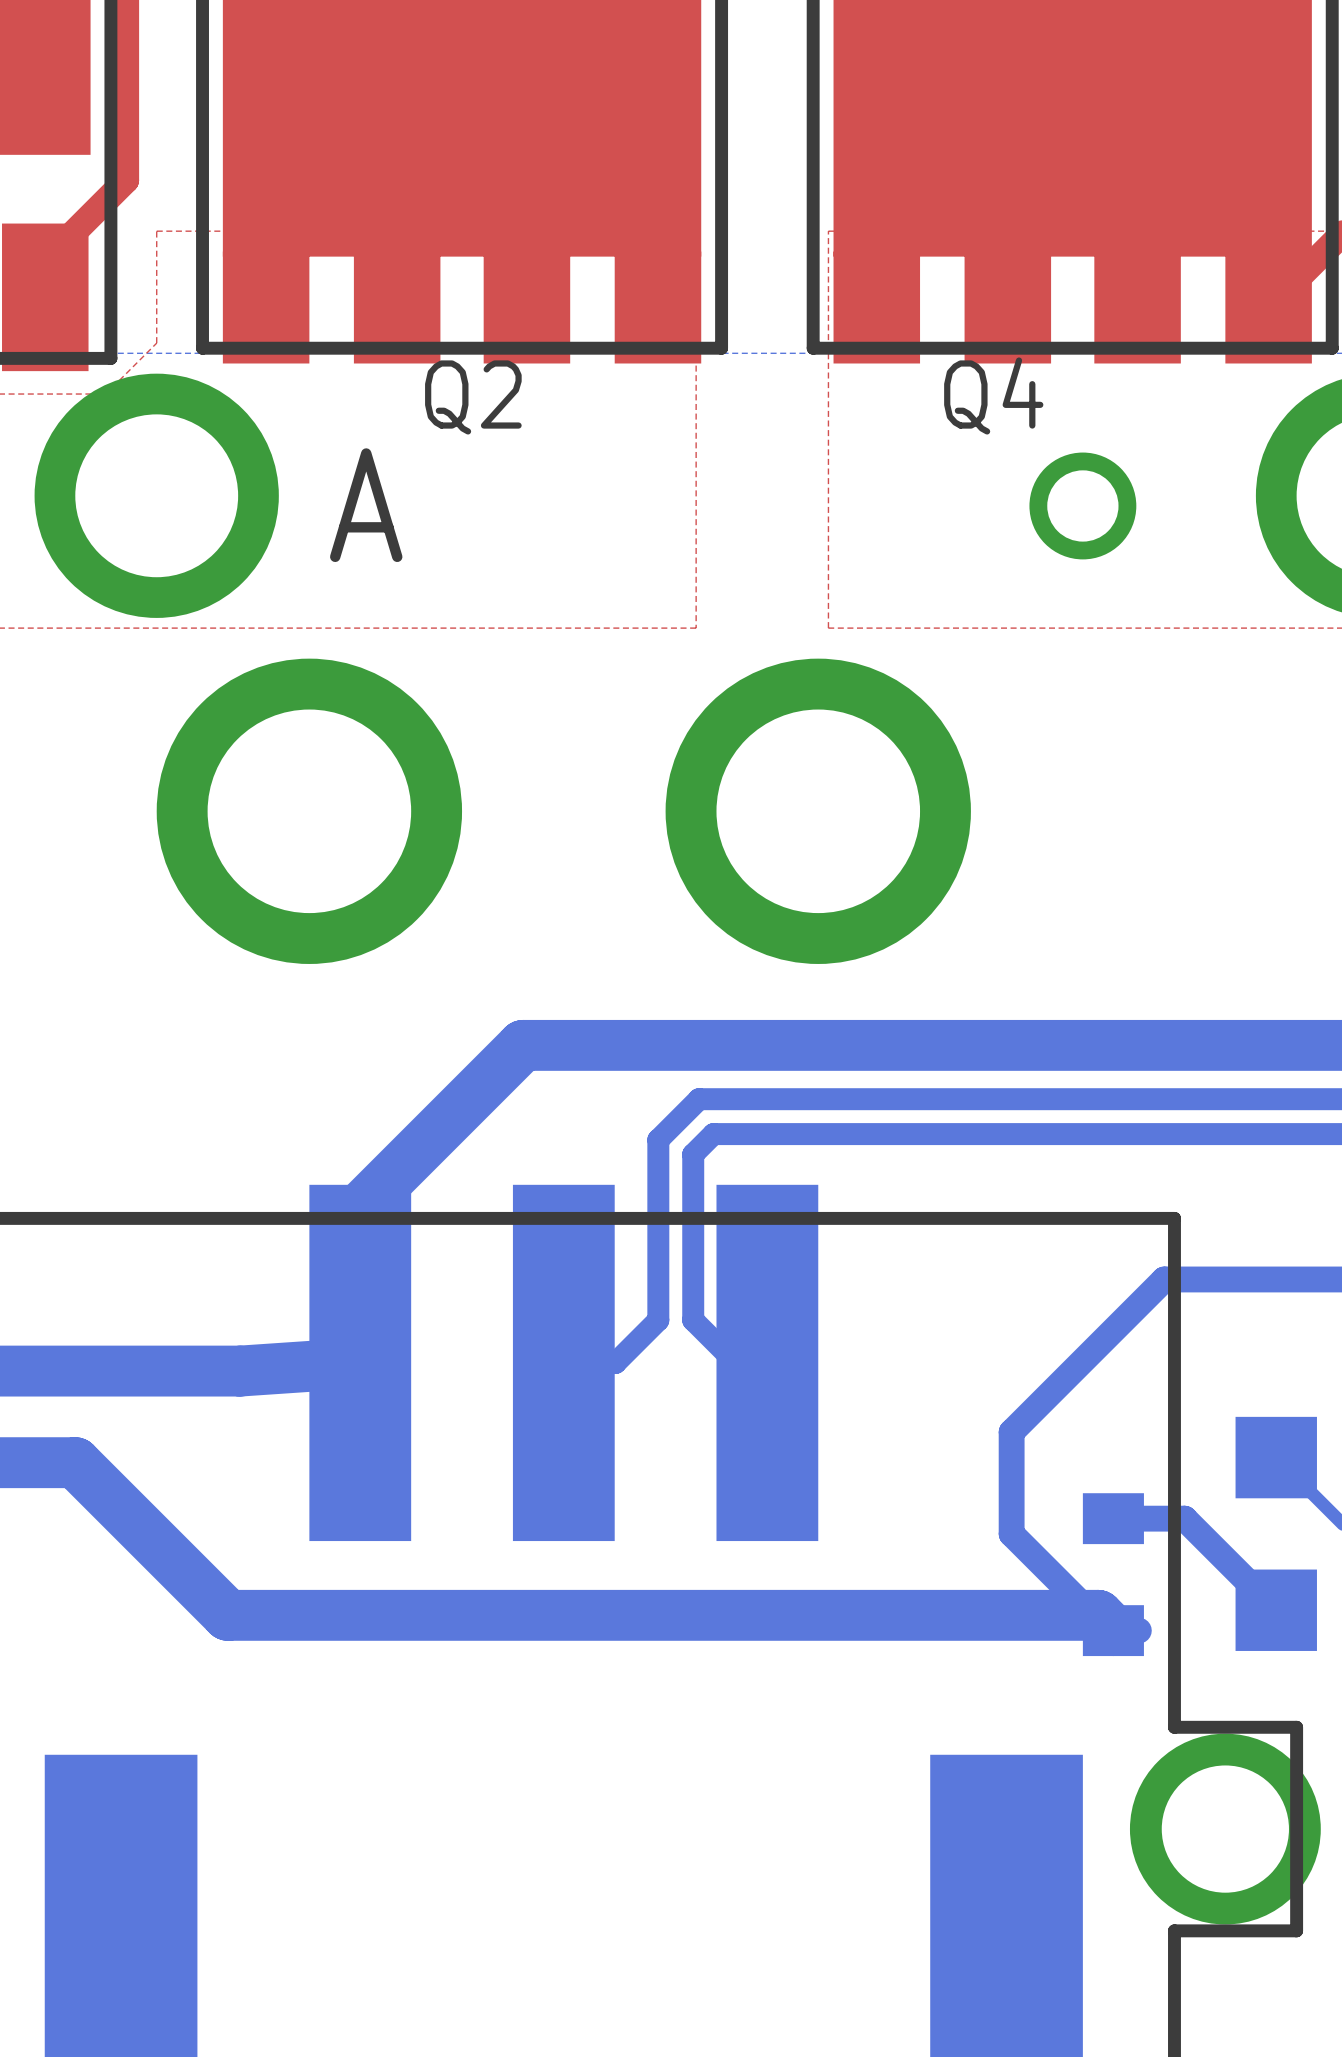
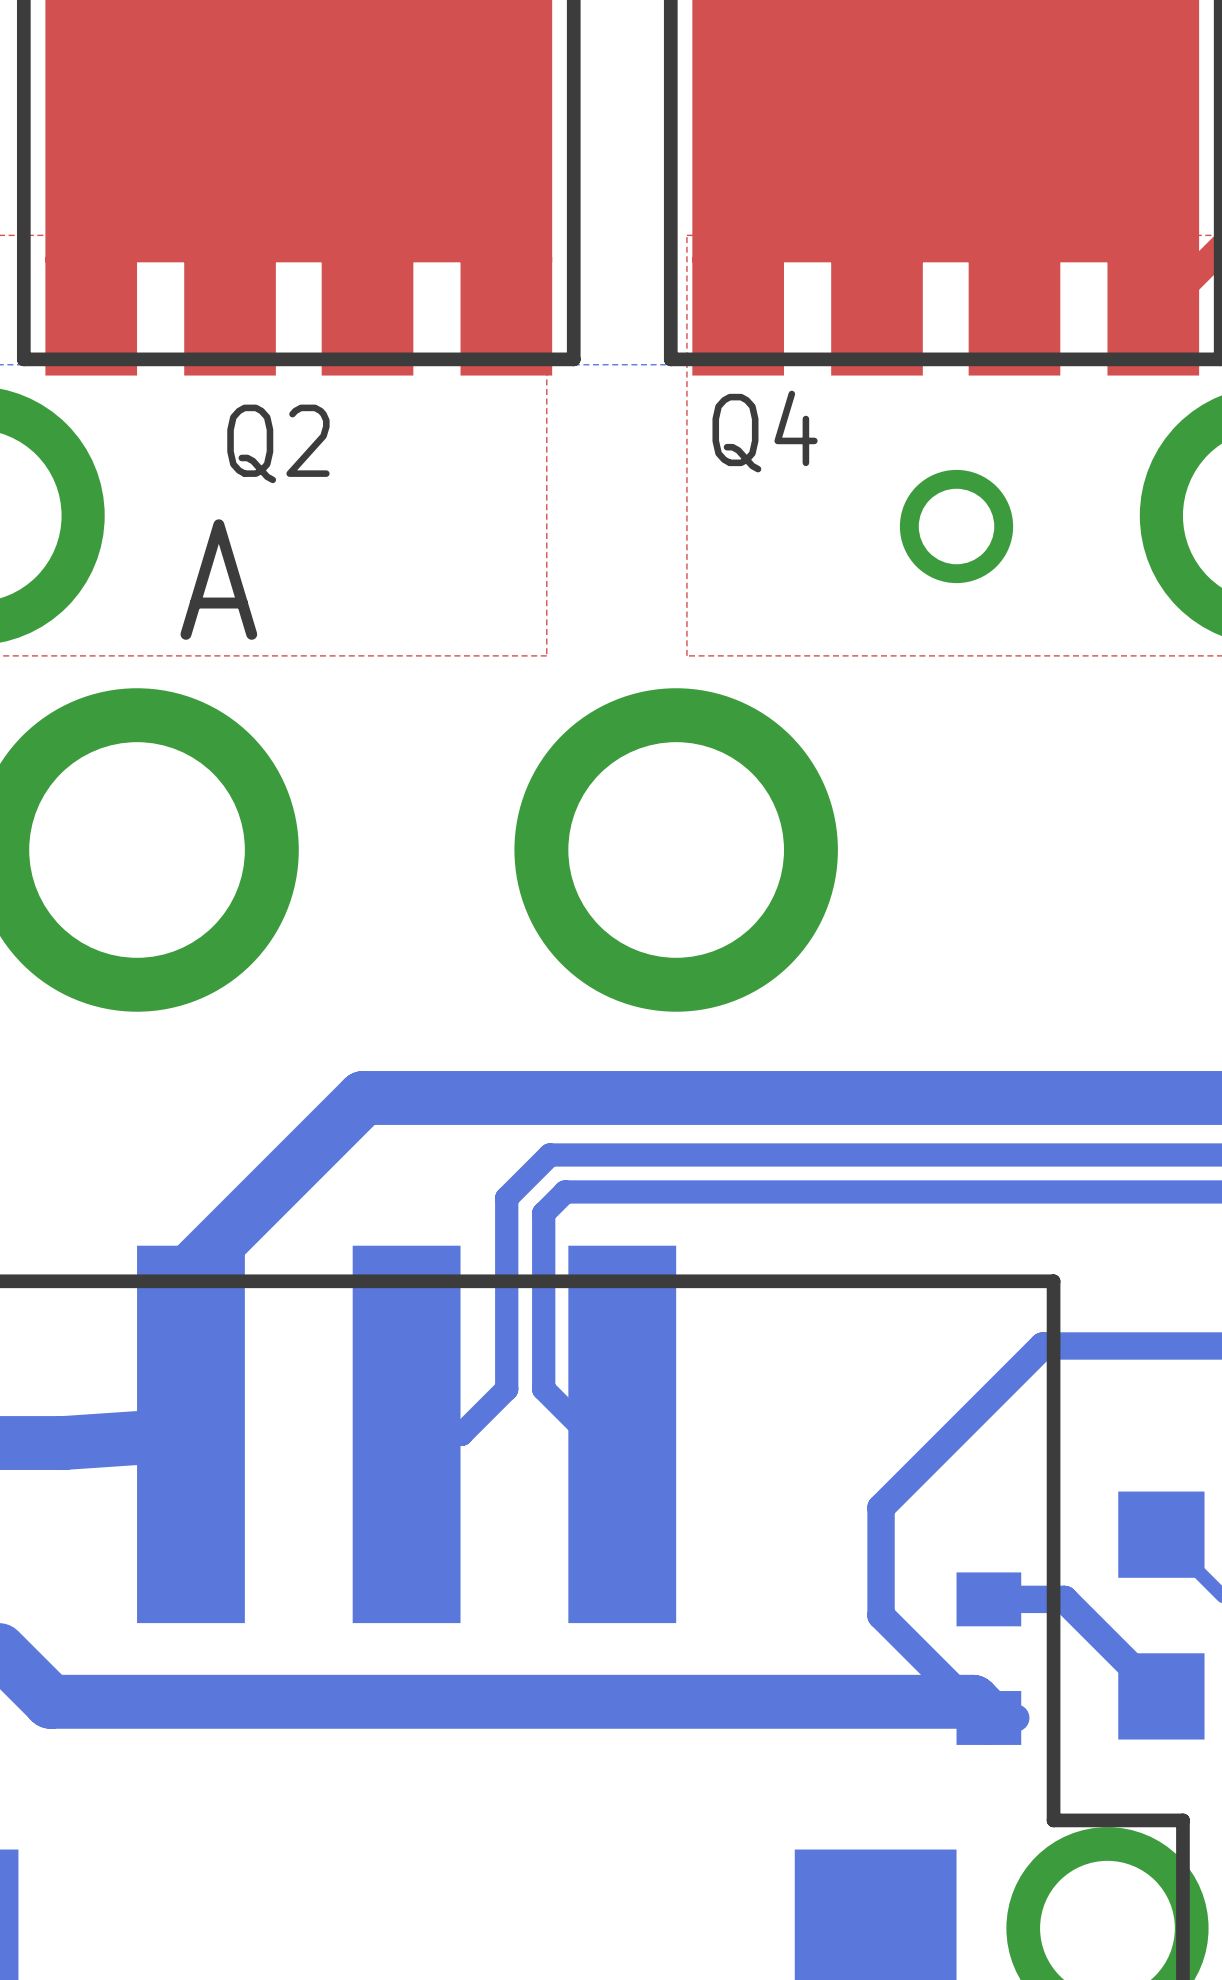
Q4 name position: Q4 (993, 395) -> Q4 (765, 431)
Q2 name position: Q2 (473, 397) -> Q2 (278, 443)
text position: A (366, 505) -> A (218, 579)

